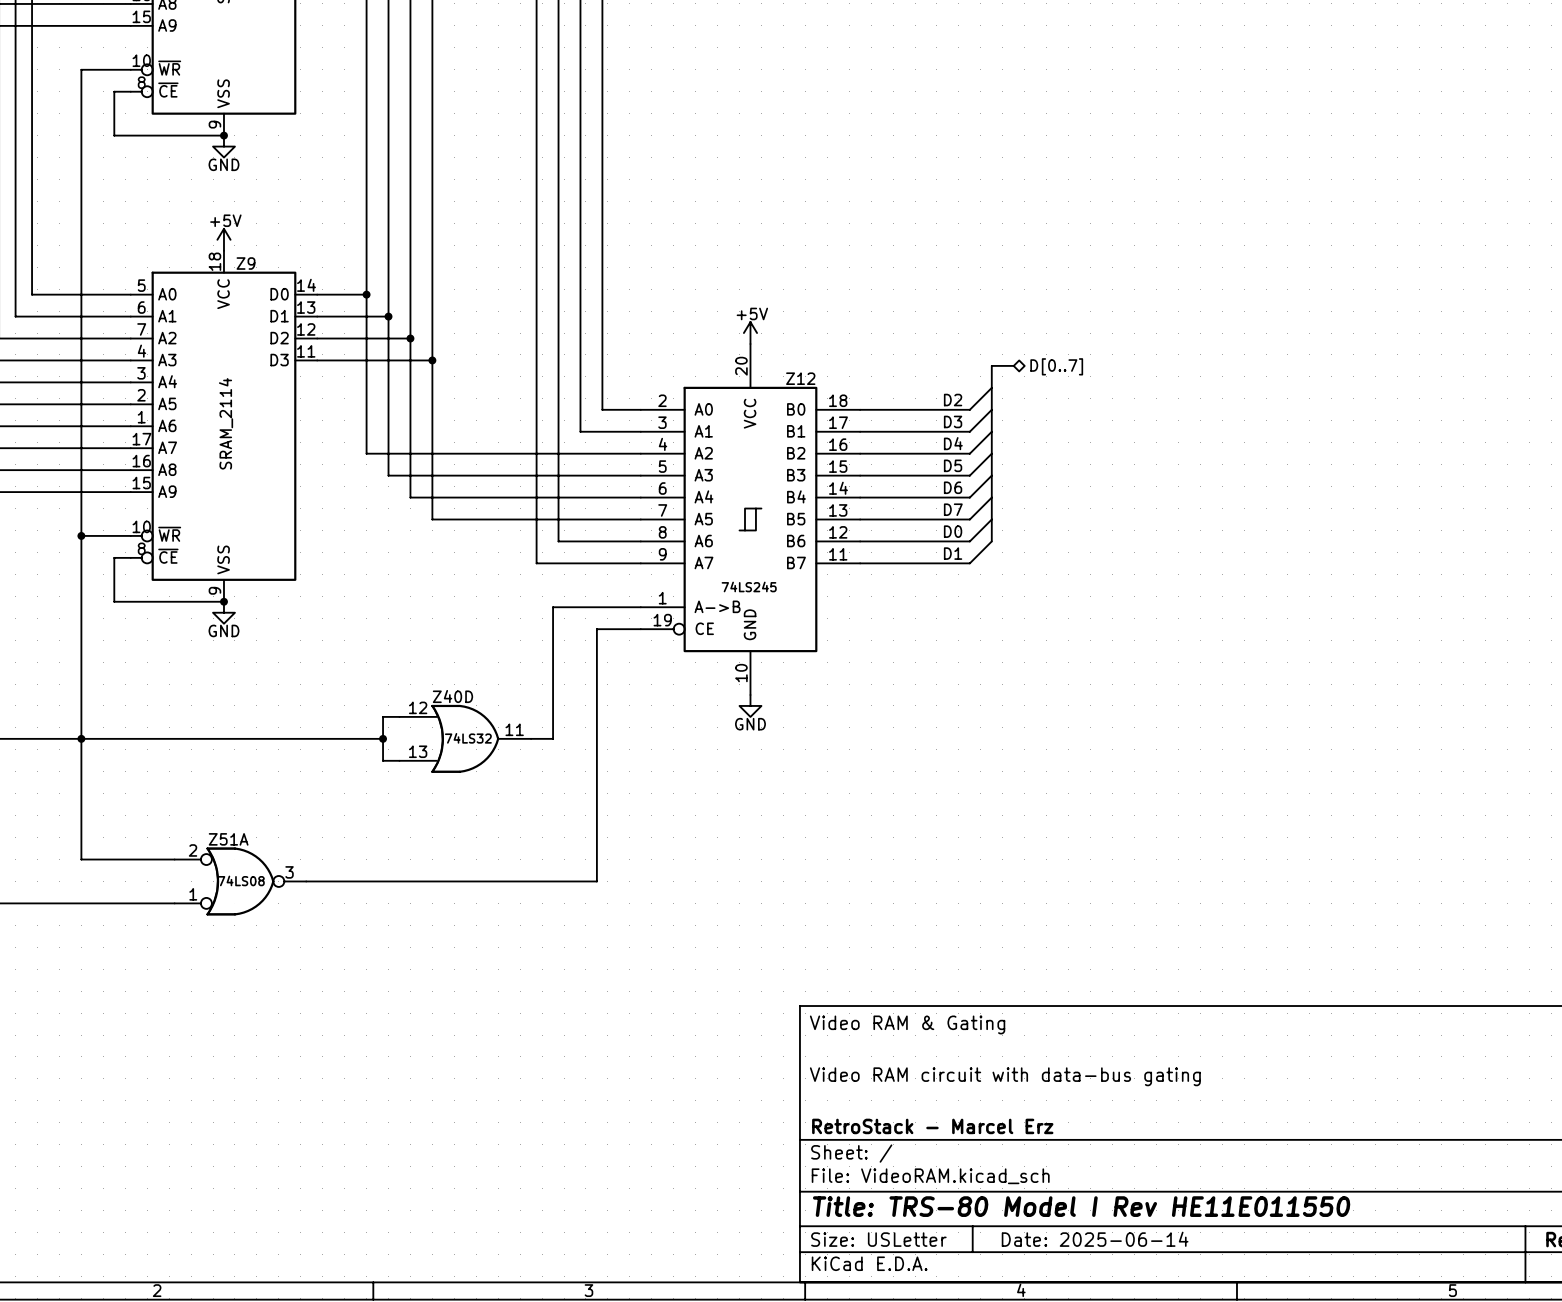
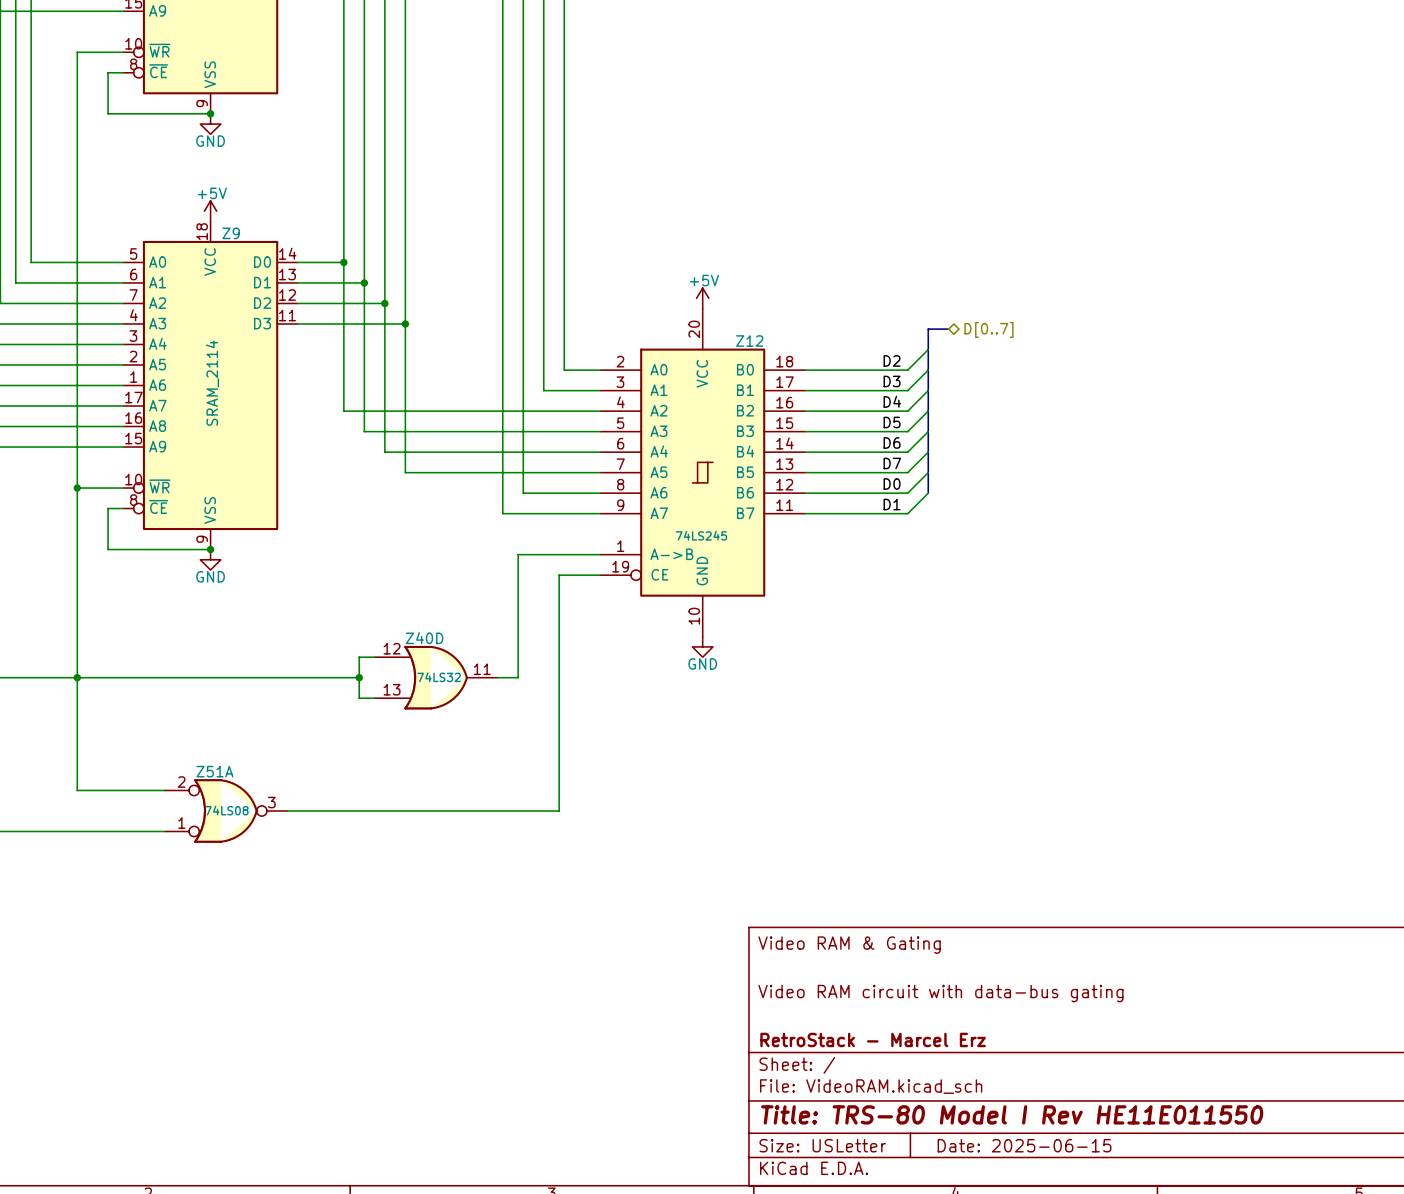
title block: Date: 2025-06-14 (1095, 1239) -> Date: 2025-06-15 (1024, 1145)

